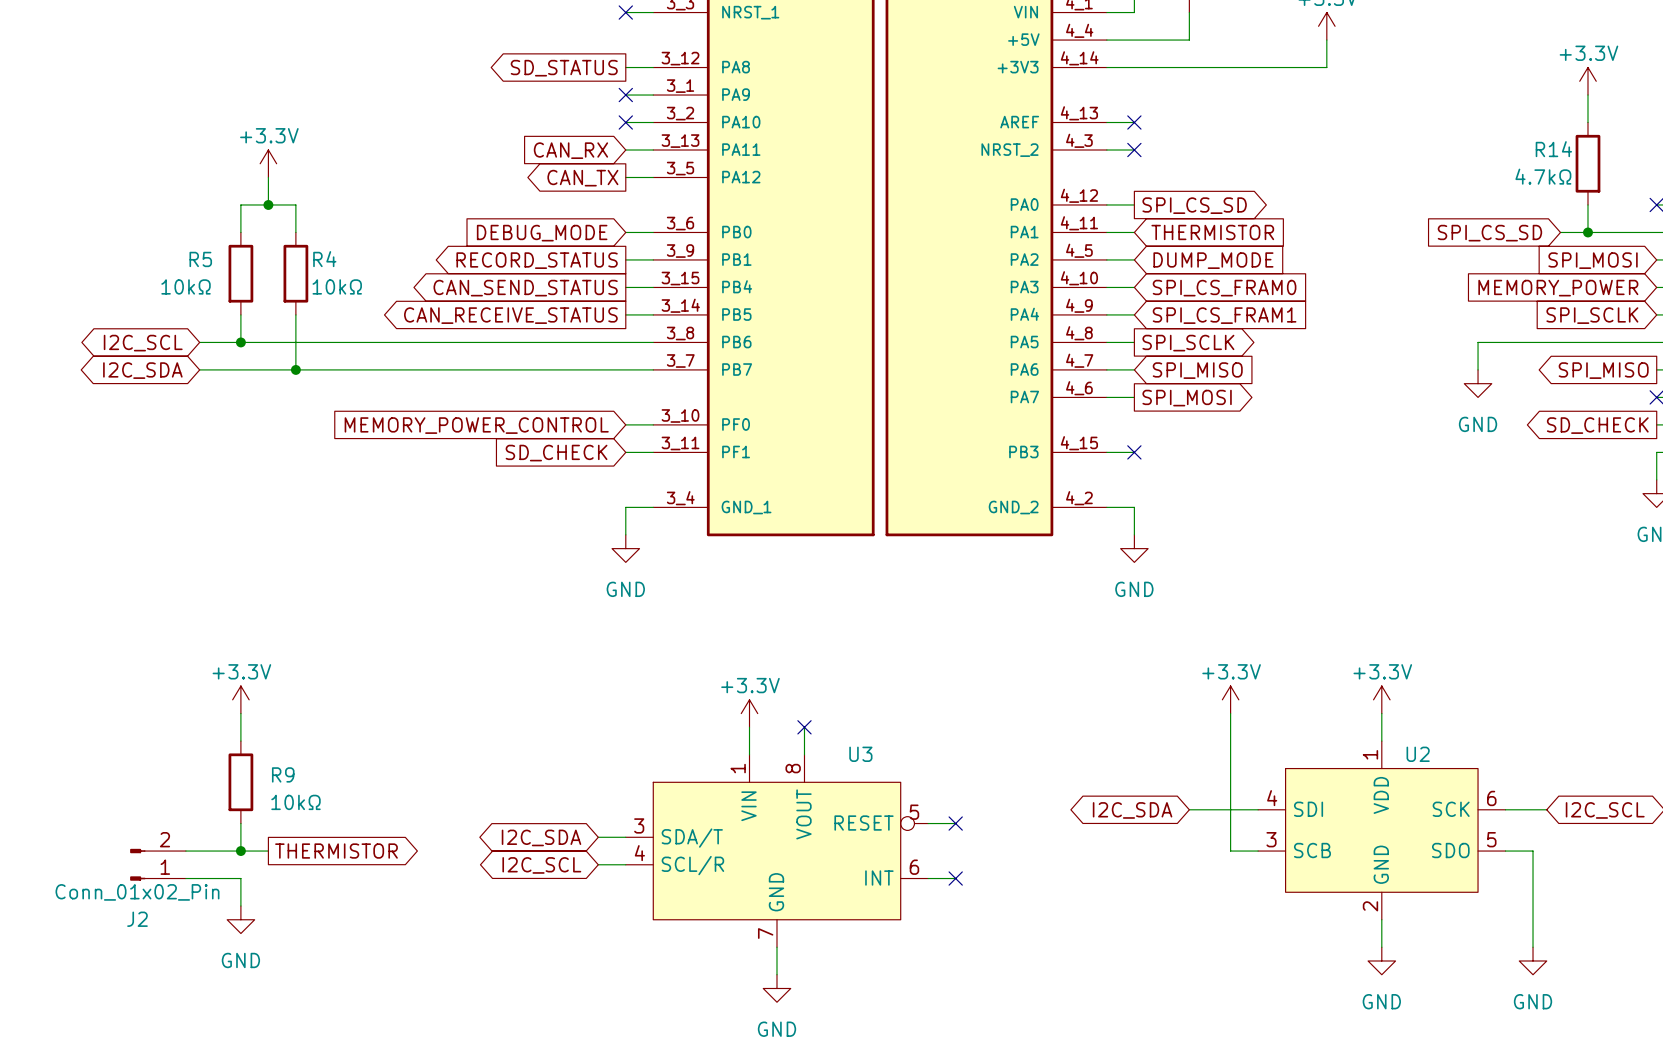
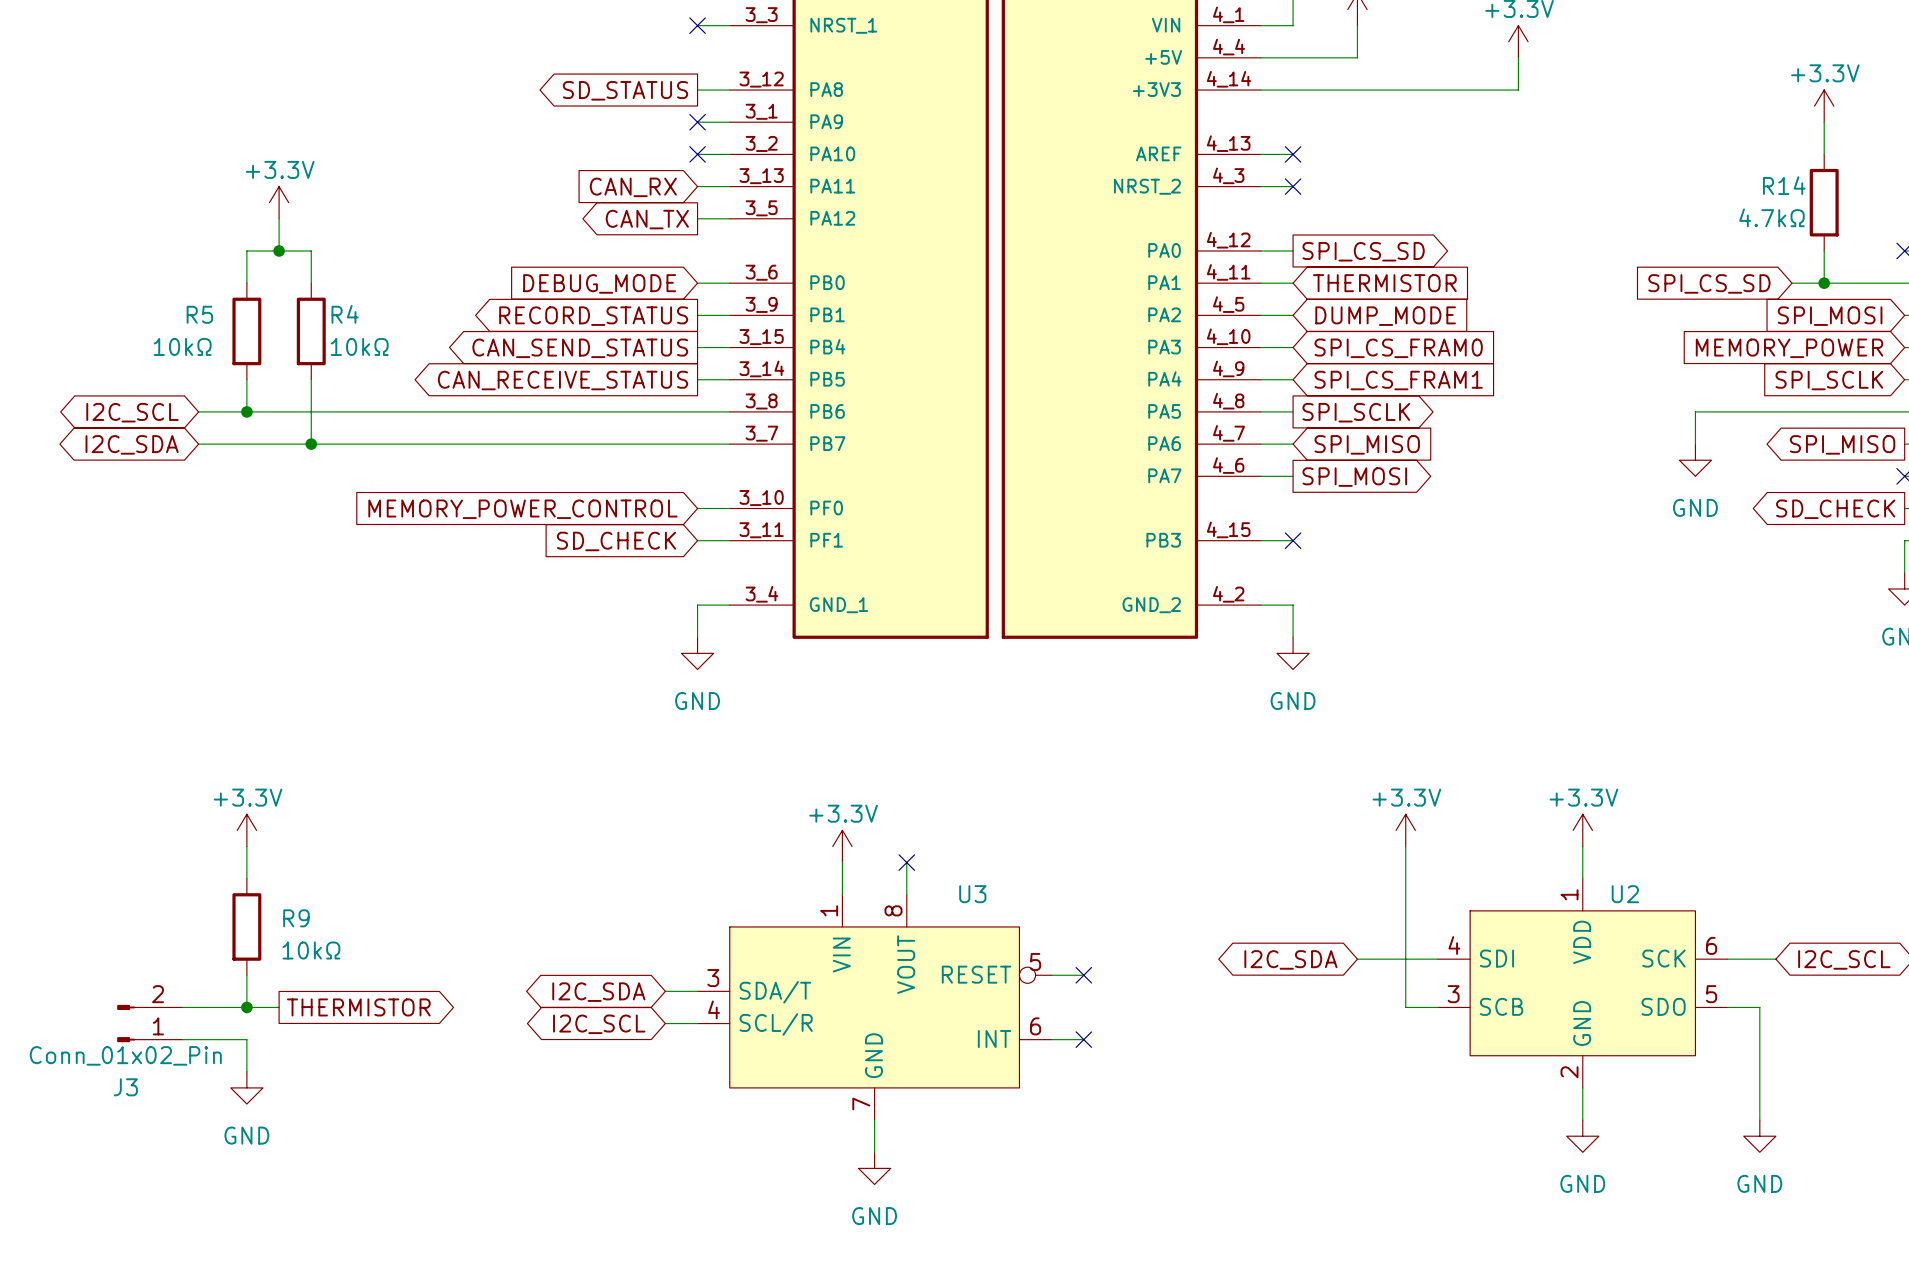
J2 name: J2 (137, 919) -> J3 (125, 1087)

